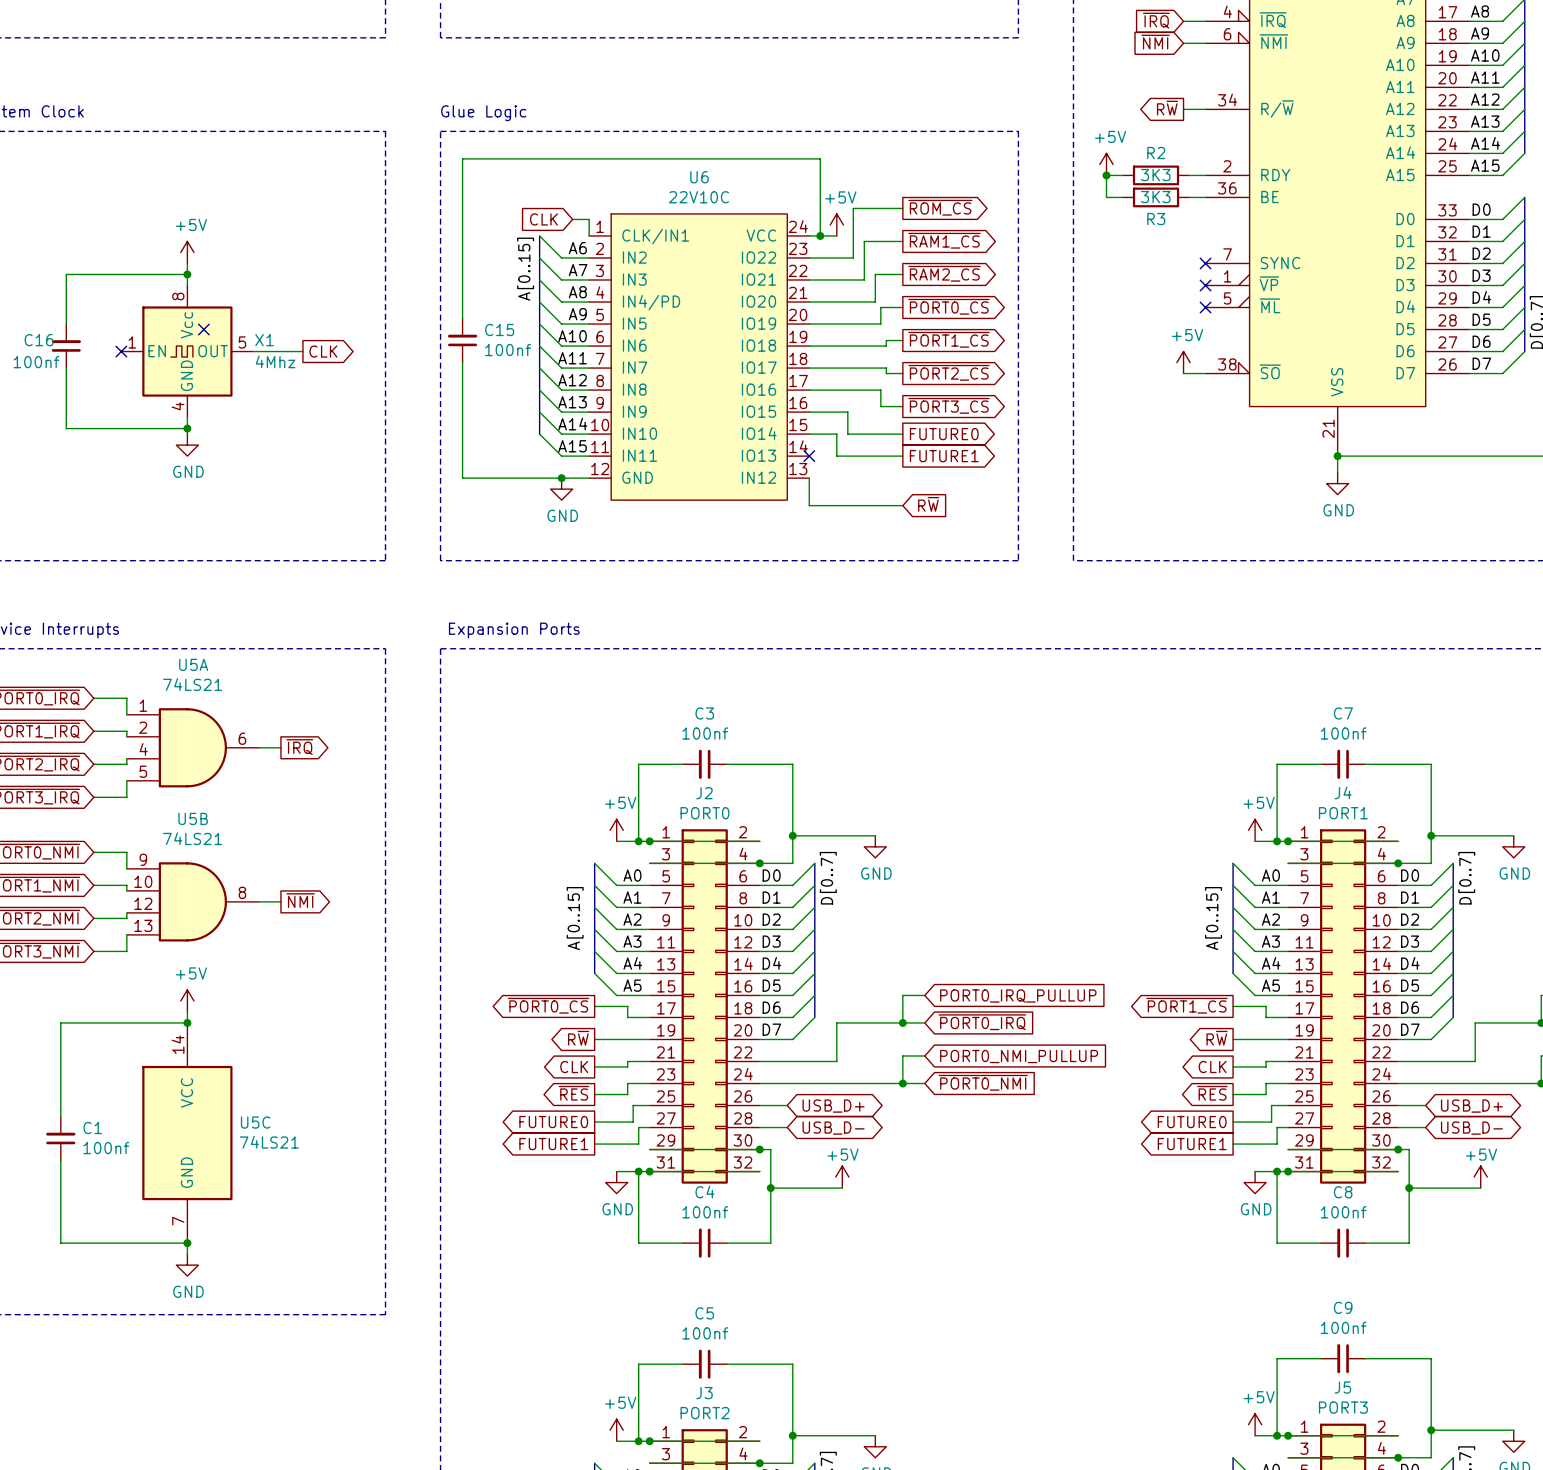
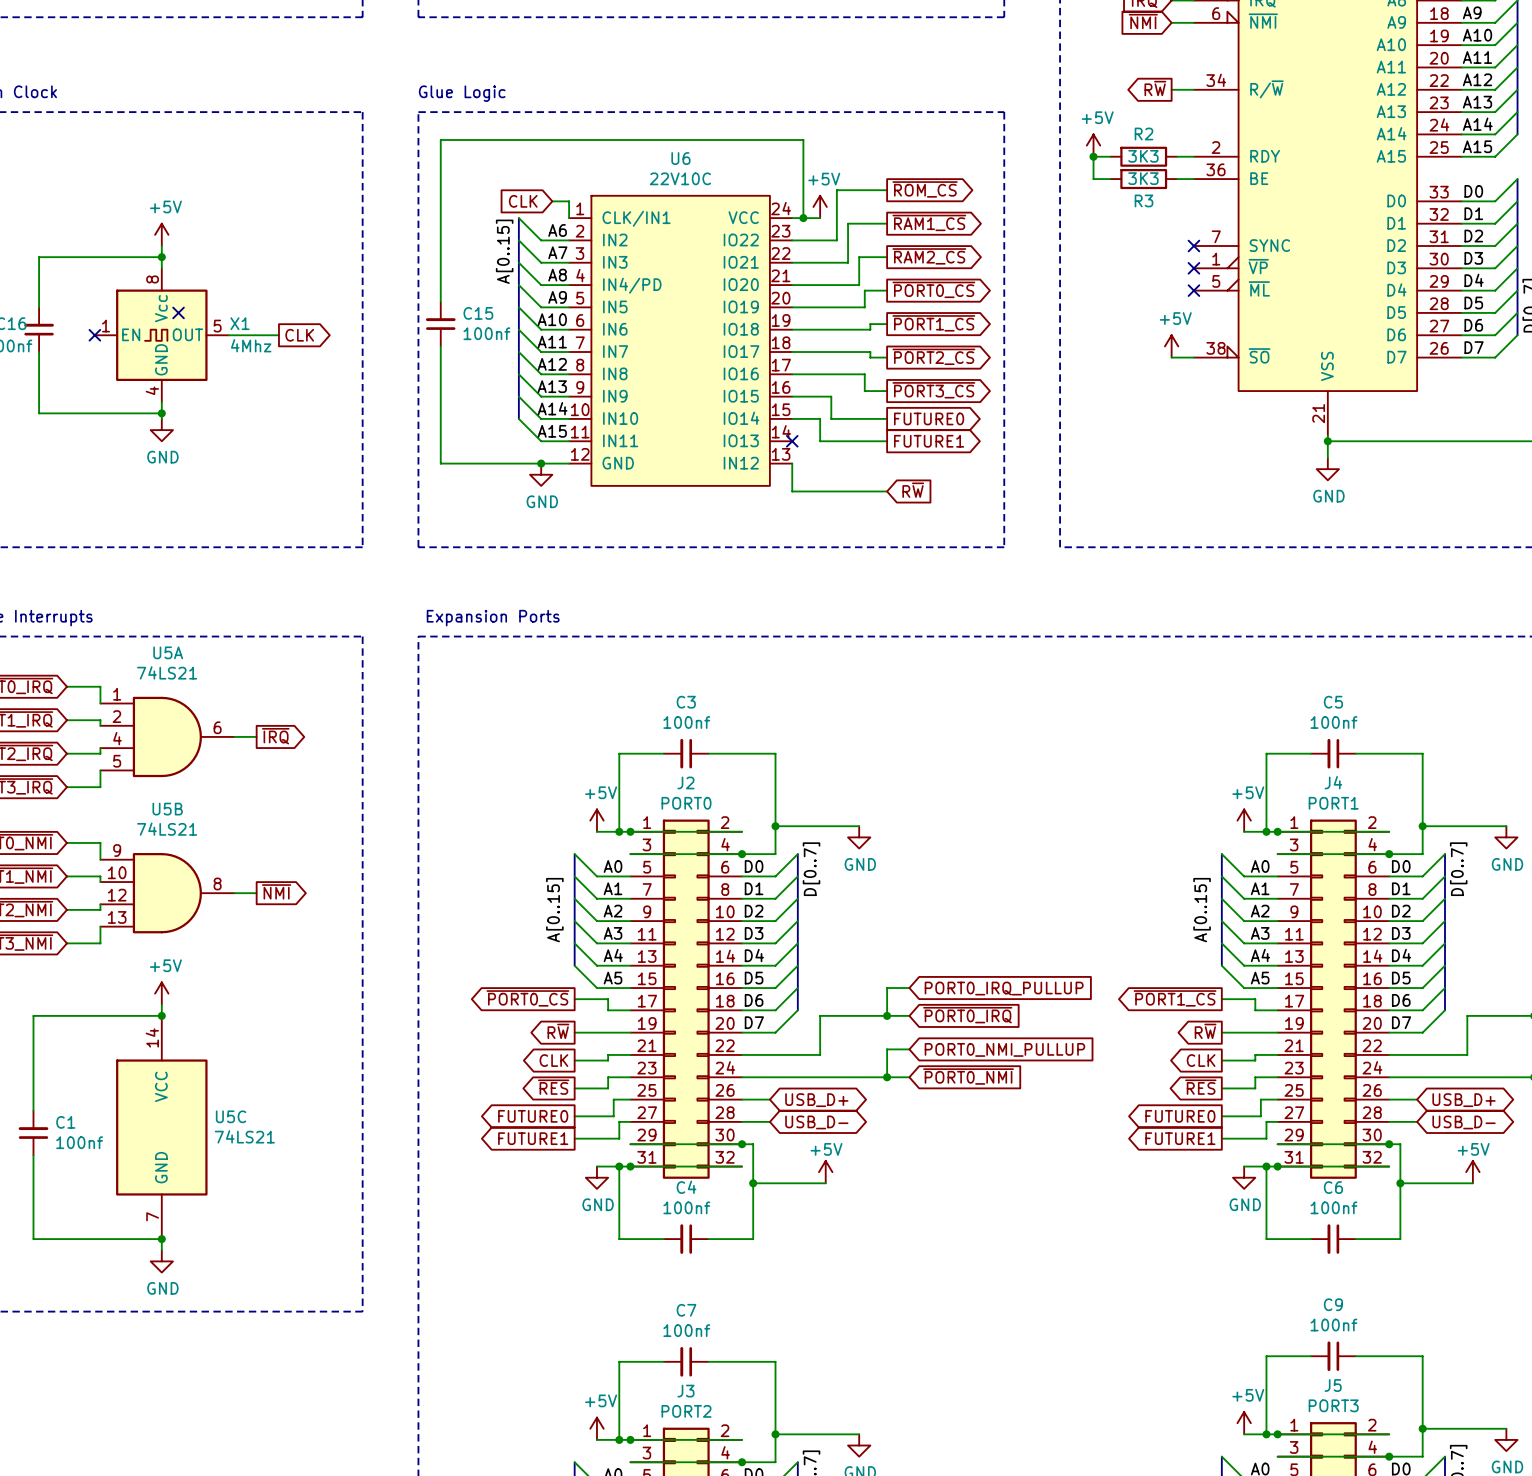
C7 name: C7 (1343, 713) -> C5 (1333, 702)
C8 name: C8 (1343, 1192) -> C6 (1333, 1187)
C5 name: C5 (704, 1313) -> C7 (686, 1310)

